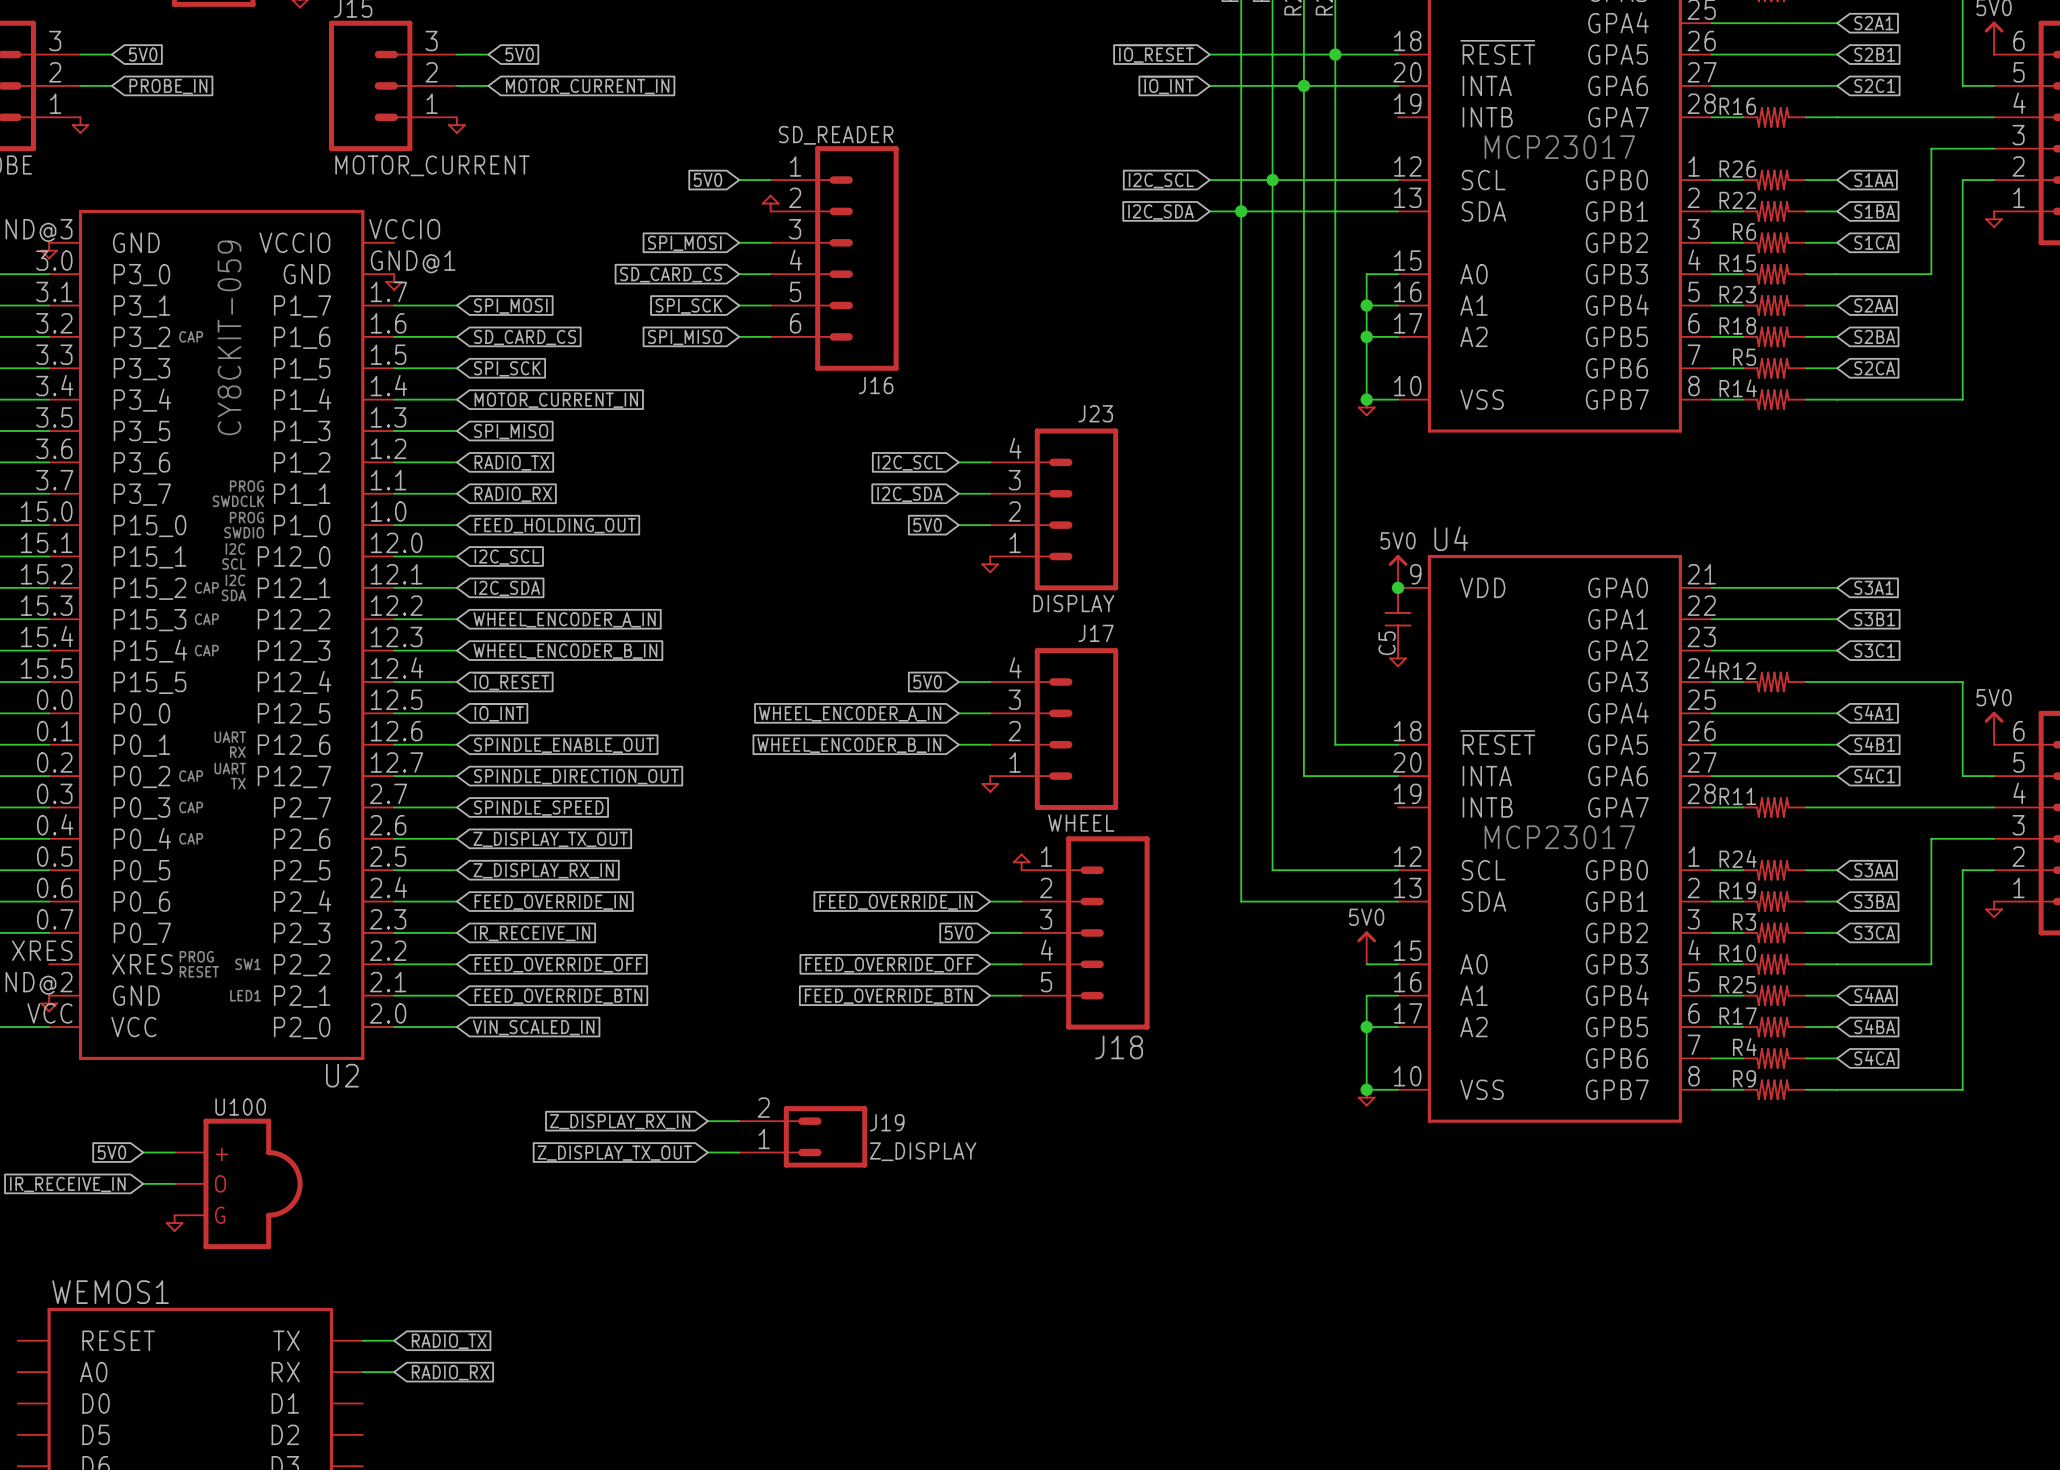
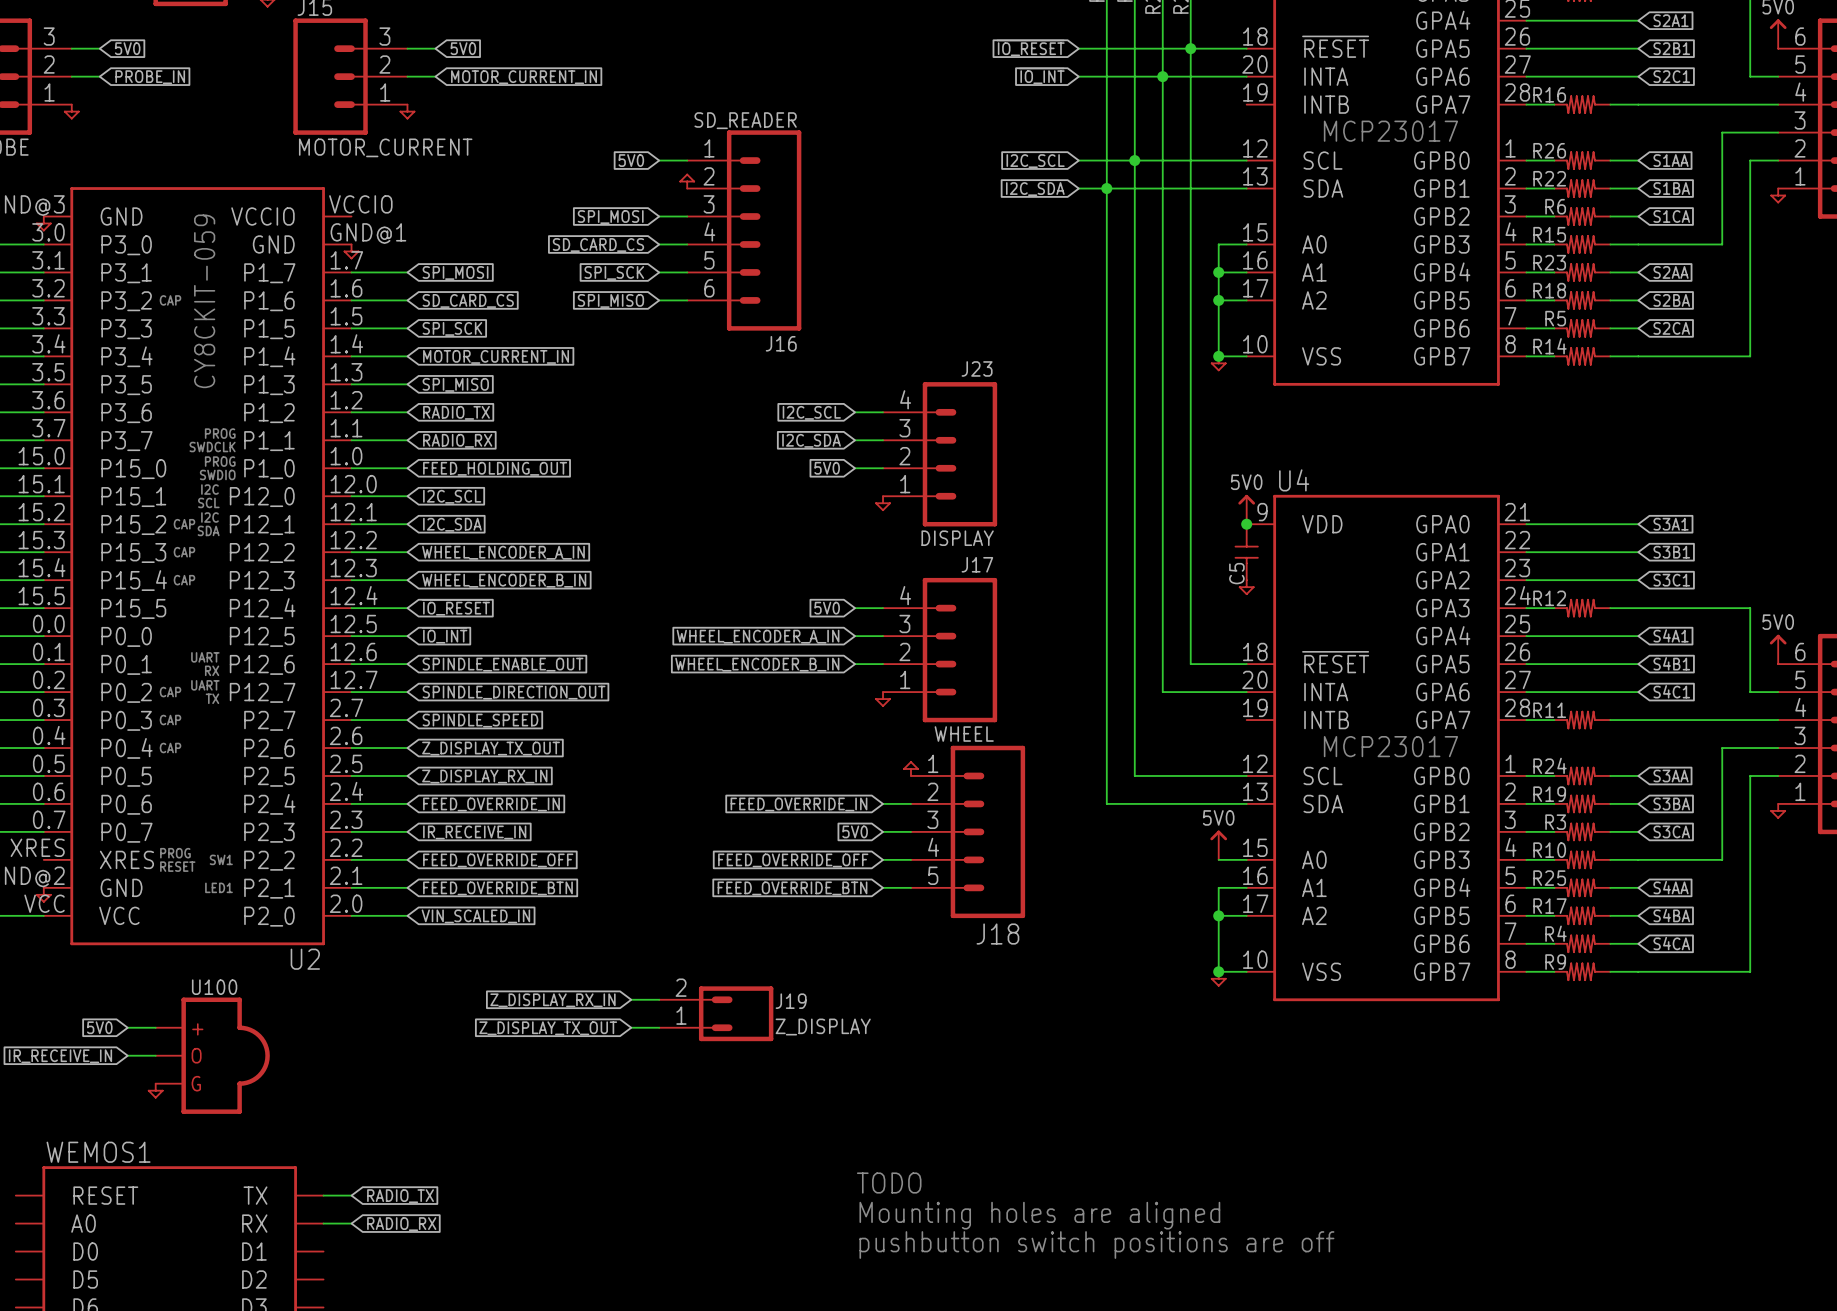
text: none -> TODO (889, 1183)
text: none -> Mounting holes are aligned (1039, 1215)
text: none -> pushbutton switch positions are off (1096, 1245)

